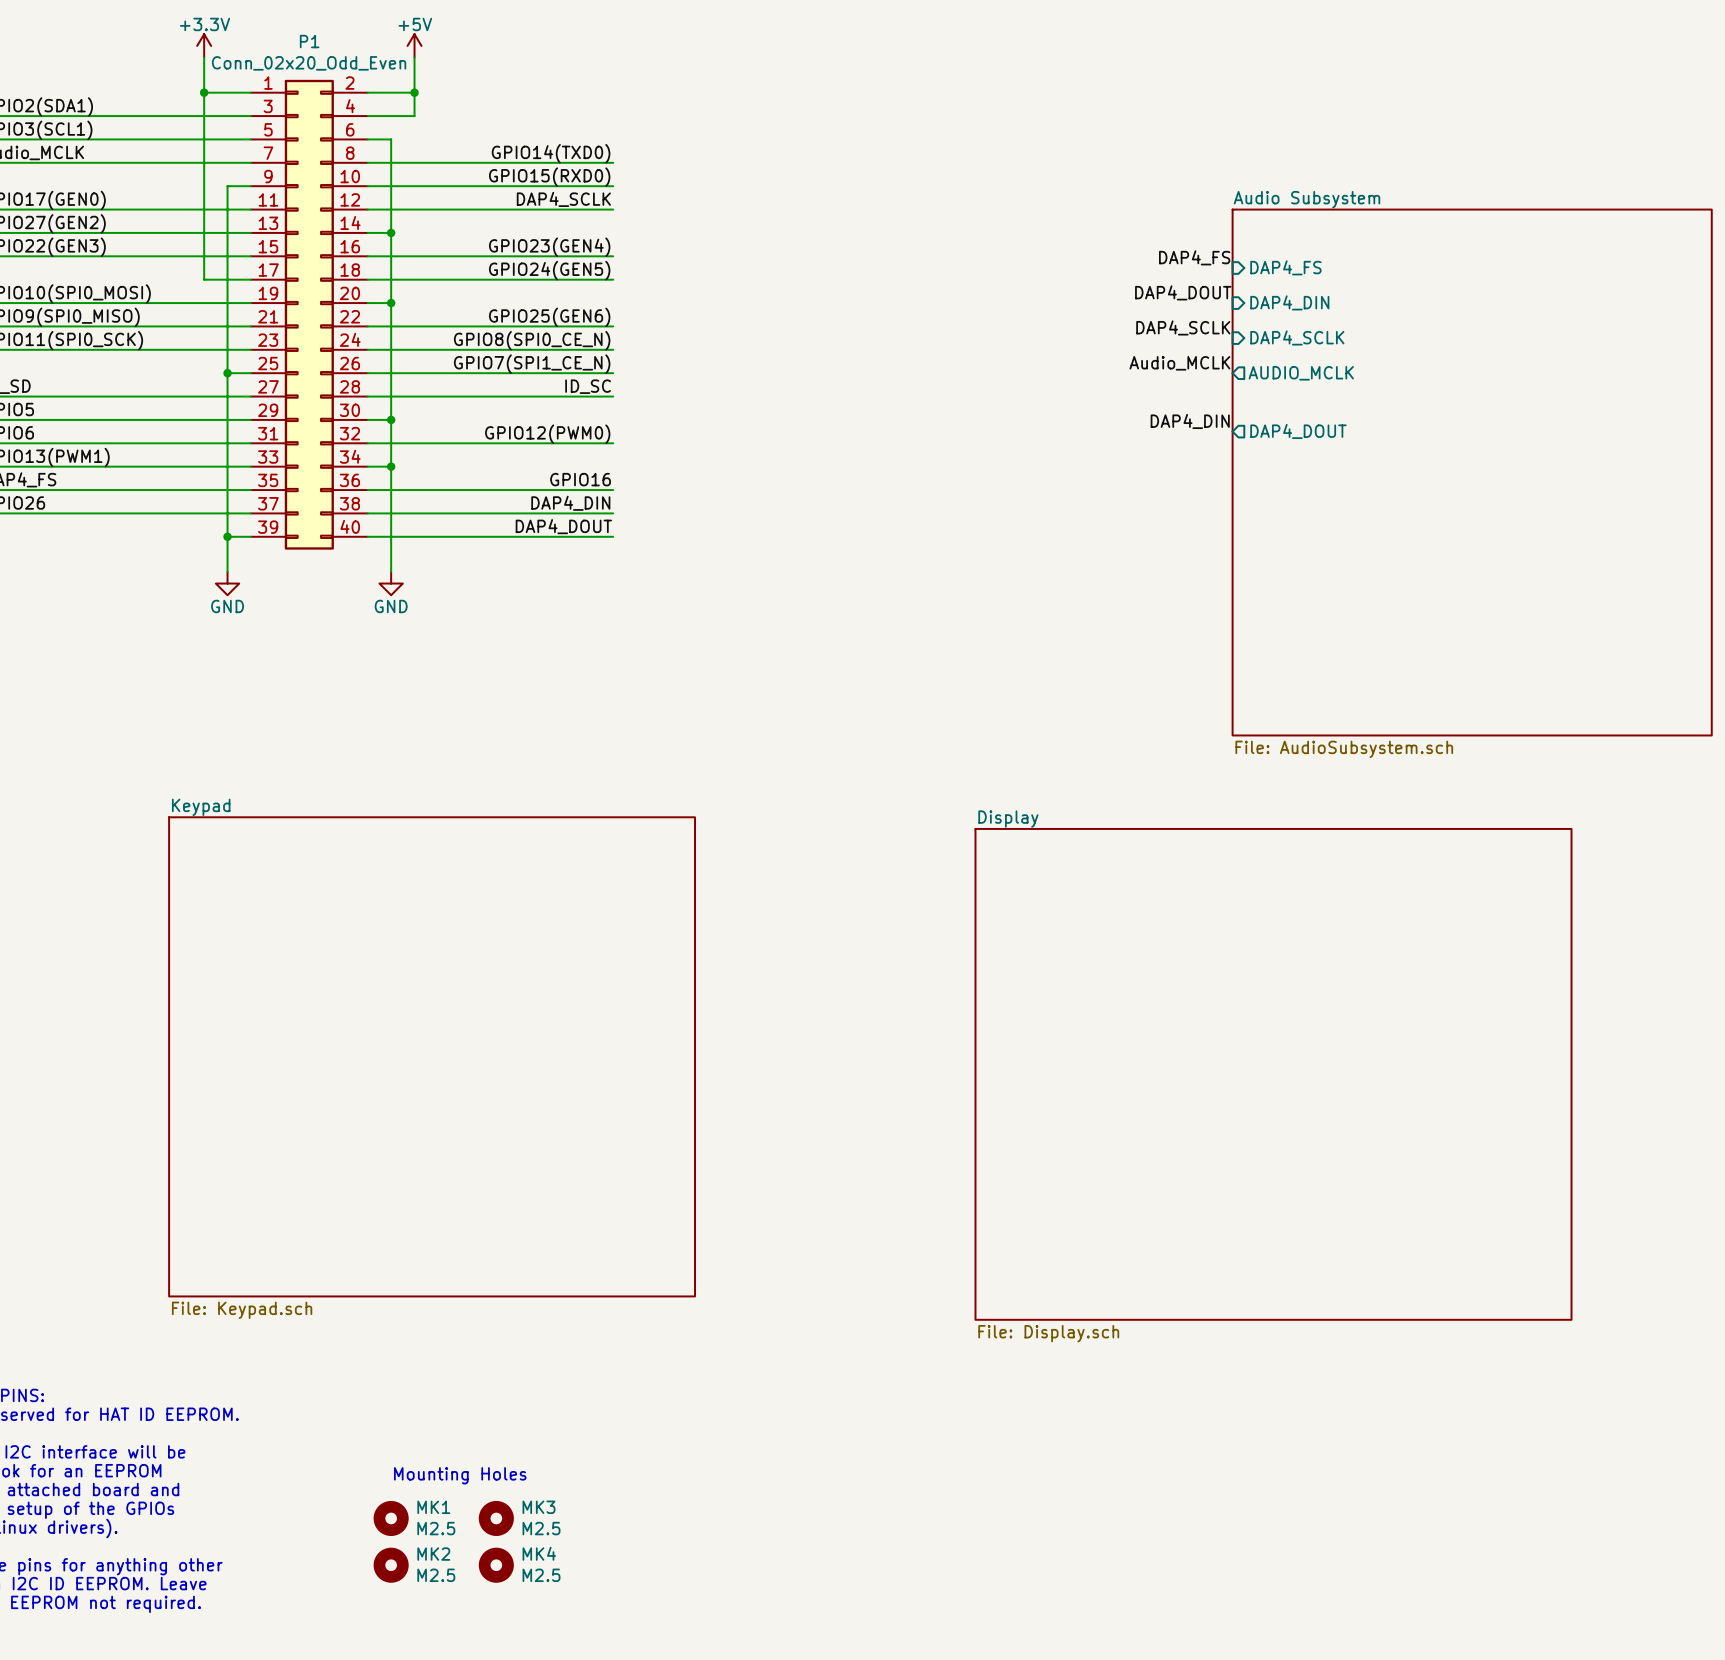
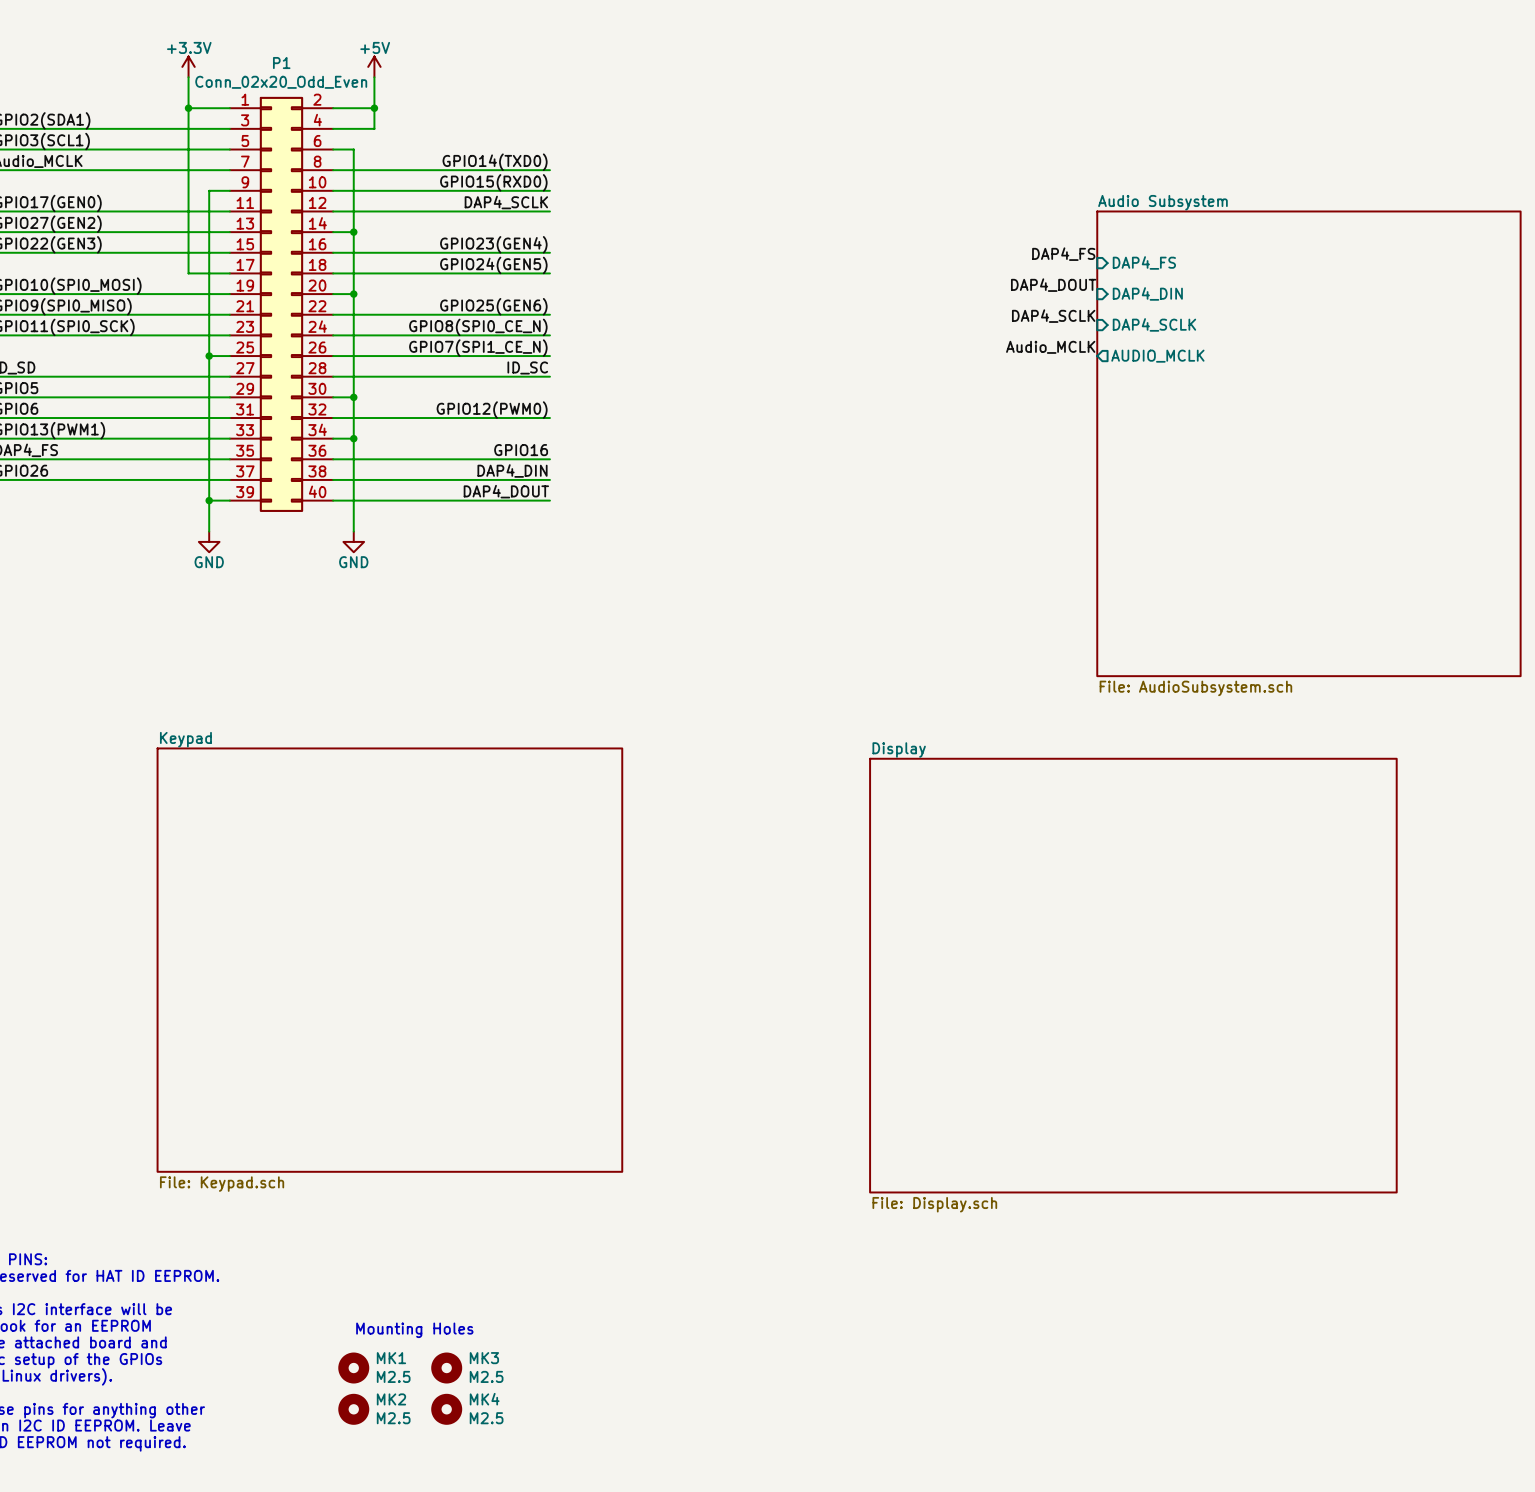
label: DAP4_DIN (1190, 421) -> none
sheet pin: DAP4_DOUT (1298, 431) -> none

